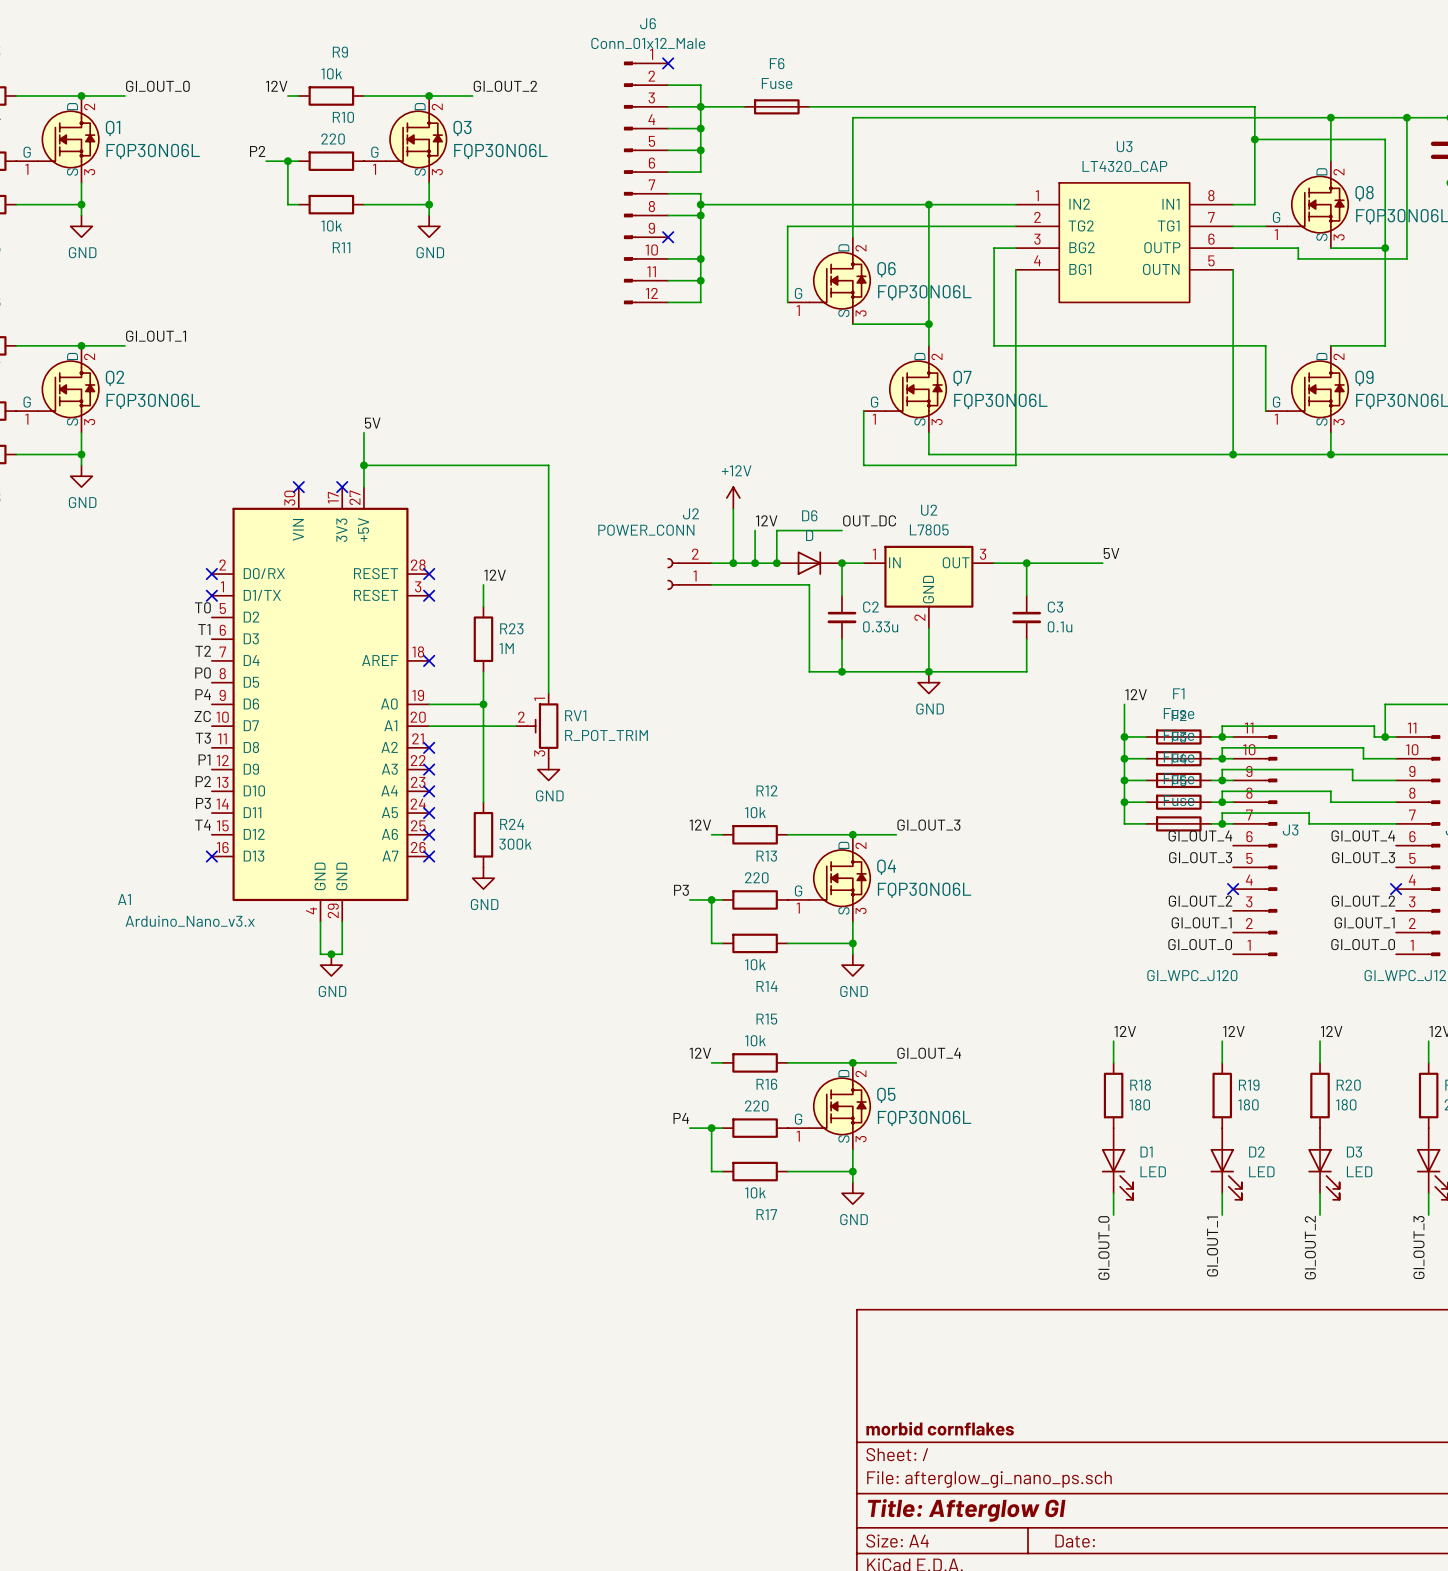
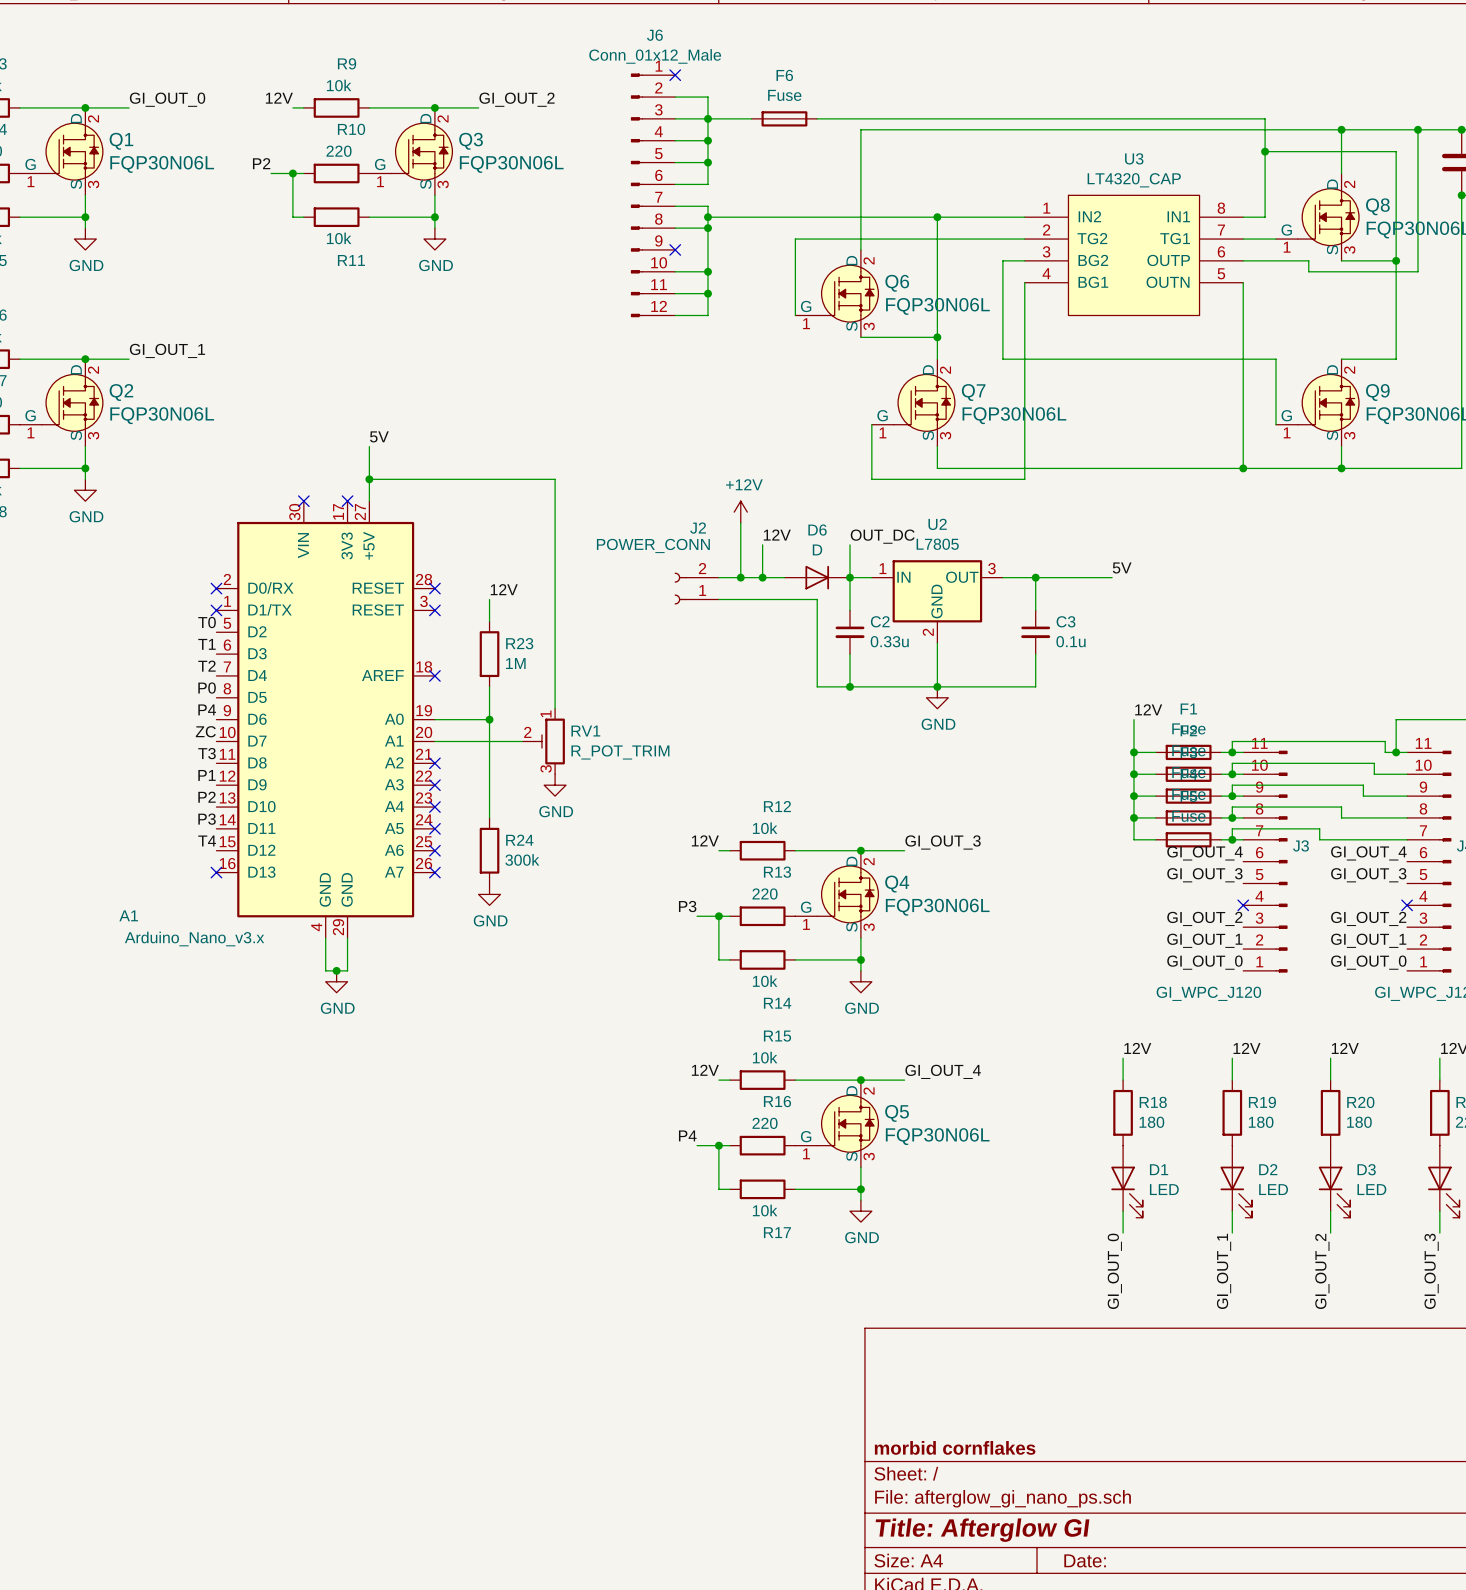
wire: (841, 530) (776, 530) (776, 563) -> (850, 544) (850, 577)
junction: (776, 563) -> none

